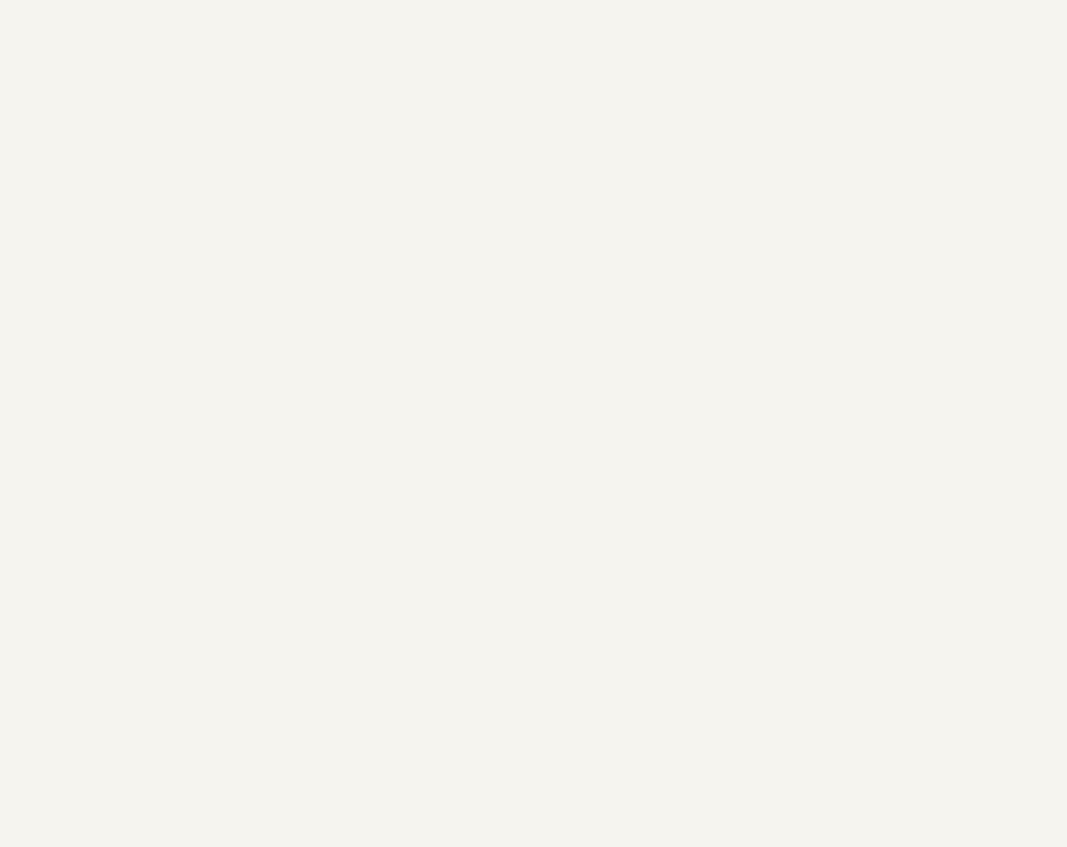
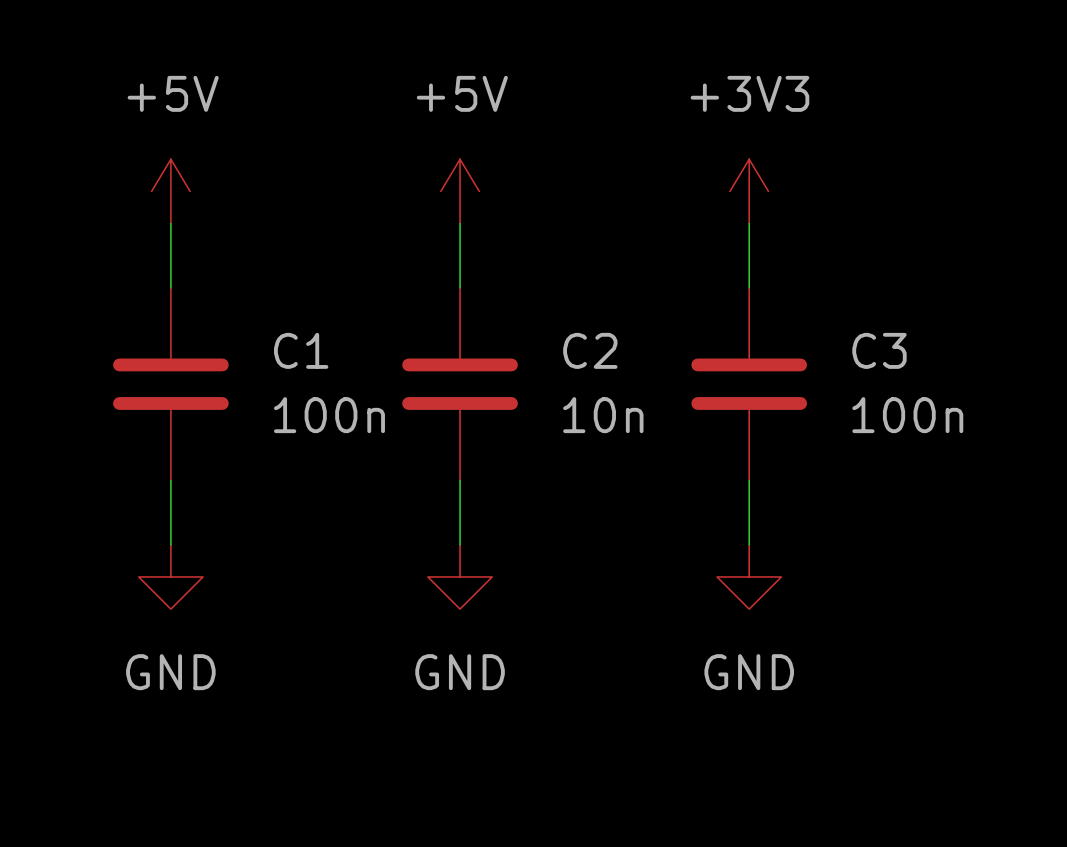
power symbol: none -> +5V (170, 191)
power symbol: none -> +5V (460, 191)
power symbol: none -> +3V3 (749, 191)
wire: none -> (170, 223) (170, 287)
wire: none -> (460, 223) (460, 287)
wire: none -> (749, 223) (749, 287)
C1: none -> 100n (170, 384)
C2: none -> 10n (460, 384)
C3: none -> 100n (749, 384)
wire: none -> (170, 480) (170, 544)
wire: none -> (460, 480) (460, 544)
wire: none -> (749, 480) (749, 544)
power symbol: none -> GND (170, 576)
power symbol: none -> GND (460, 576)
power symbol: none -> GND (749, 576)

